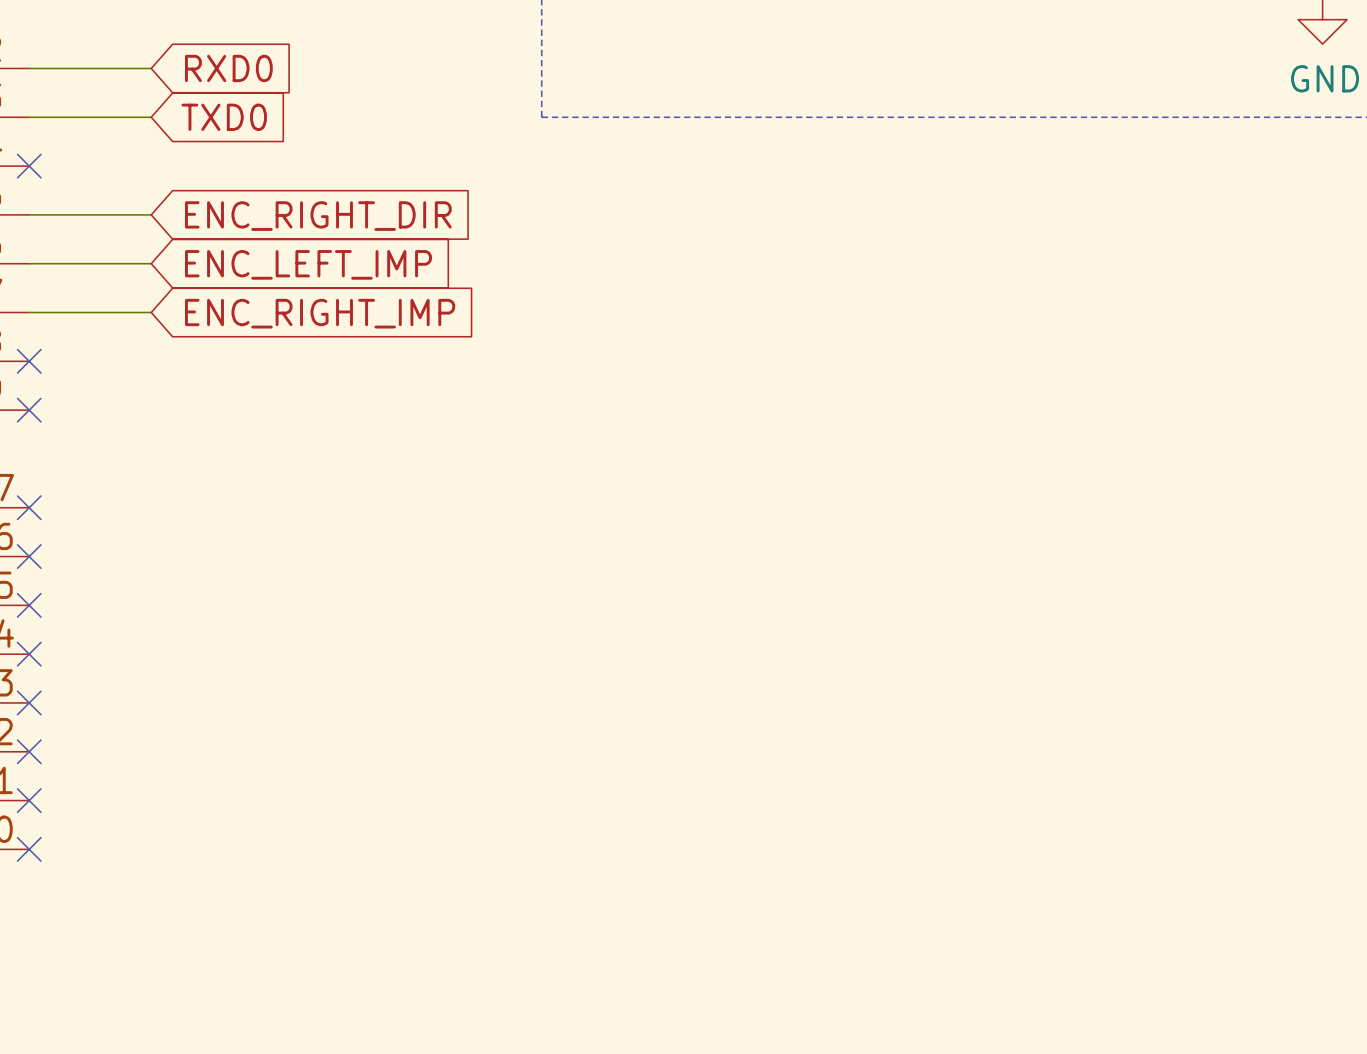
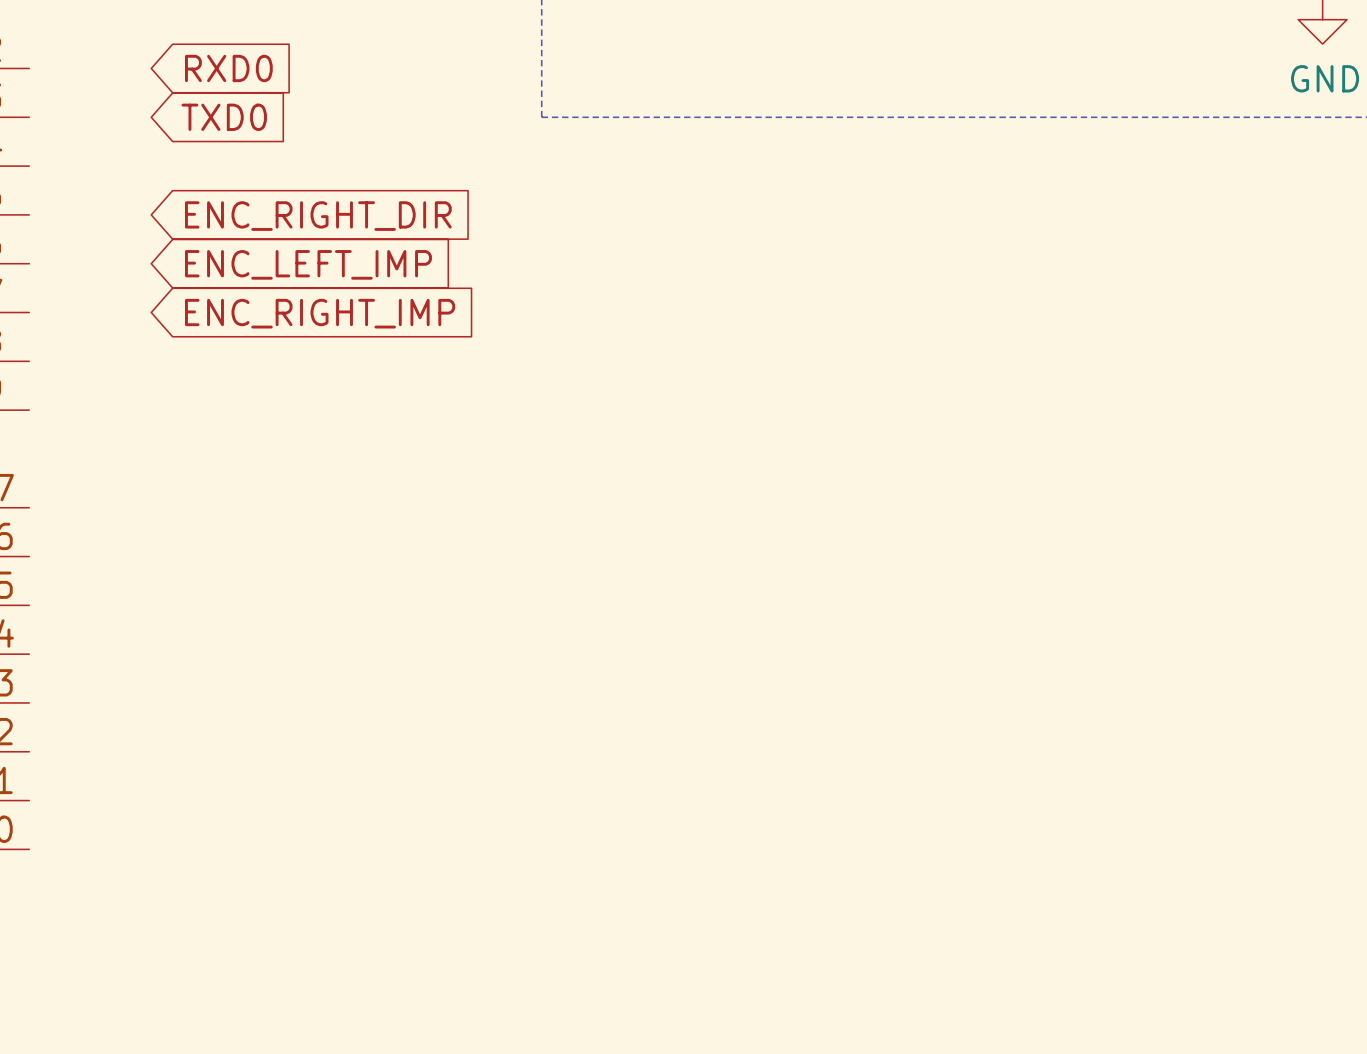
wire: (29, 68) (151, 68) -> none
wire: (29, 117) (151, 117) -> none
no-connect mark: (29, 166) -> none
wire: (29, 214) (151, 214) -> none
wire: (29, 263) (151, 263) -> none
wire: (29, 312) (151, 312) -> none
no-connect mark: (29, 361) -> none
no-connect mark: (29, 410) -> none
no-connect mark: (29, 507) -> none
no-connect mark: (29, 556) -> none
no-connect mark: (29, 605) -> none
no-connect mark: (29, 654) -> none
no-connect mark: (29, 702) -> none
no-connect mark: (29, 751) -> none
no-connect mark: (29, 800) -> none
no-connect mark: (29, 849) -> none

